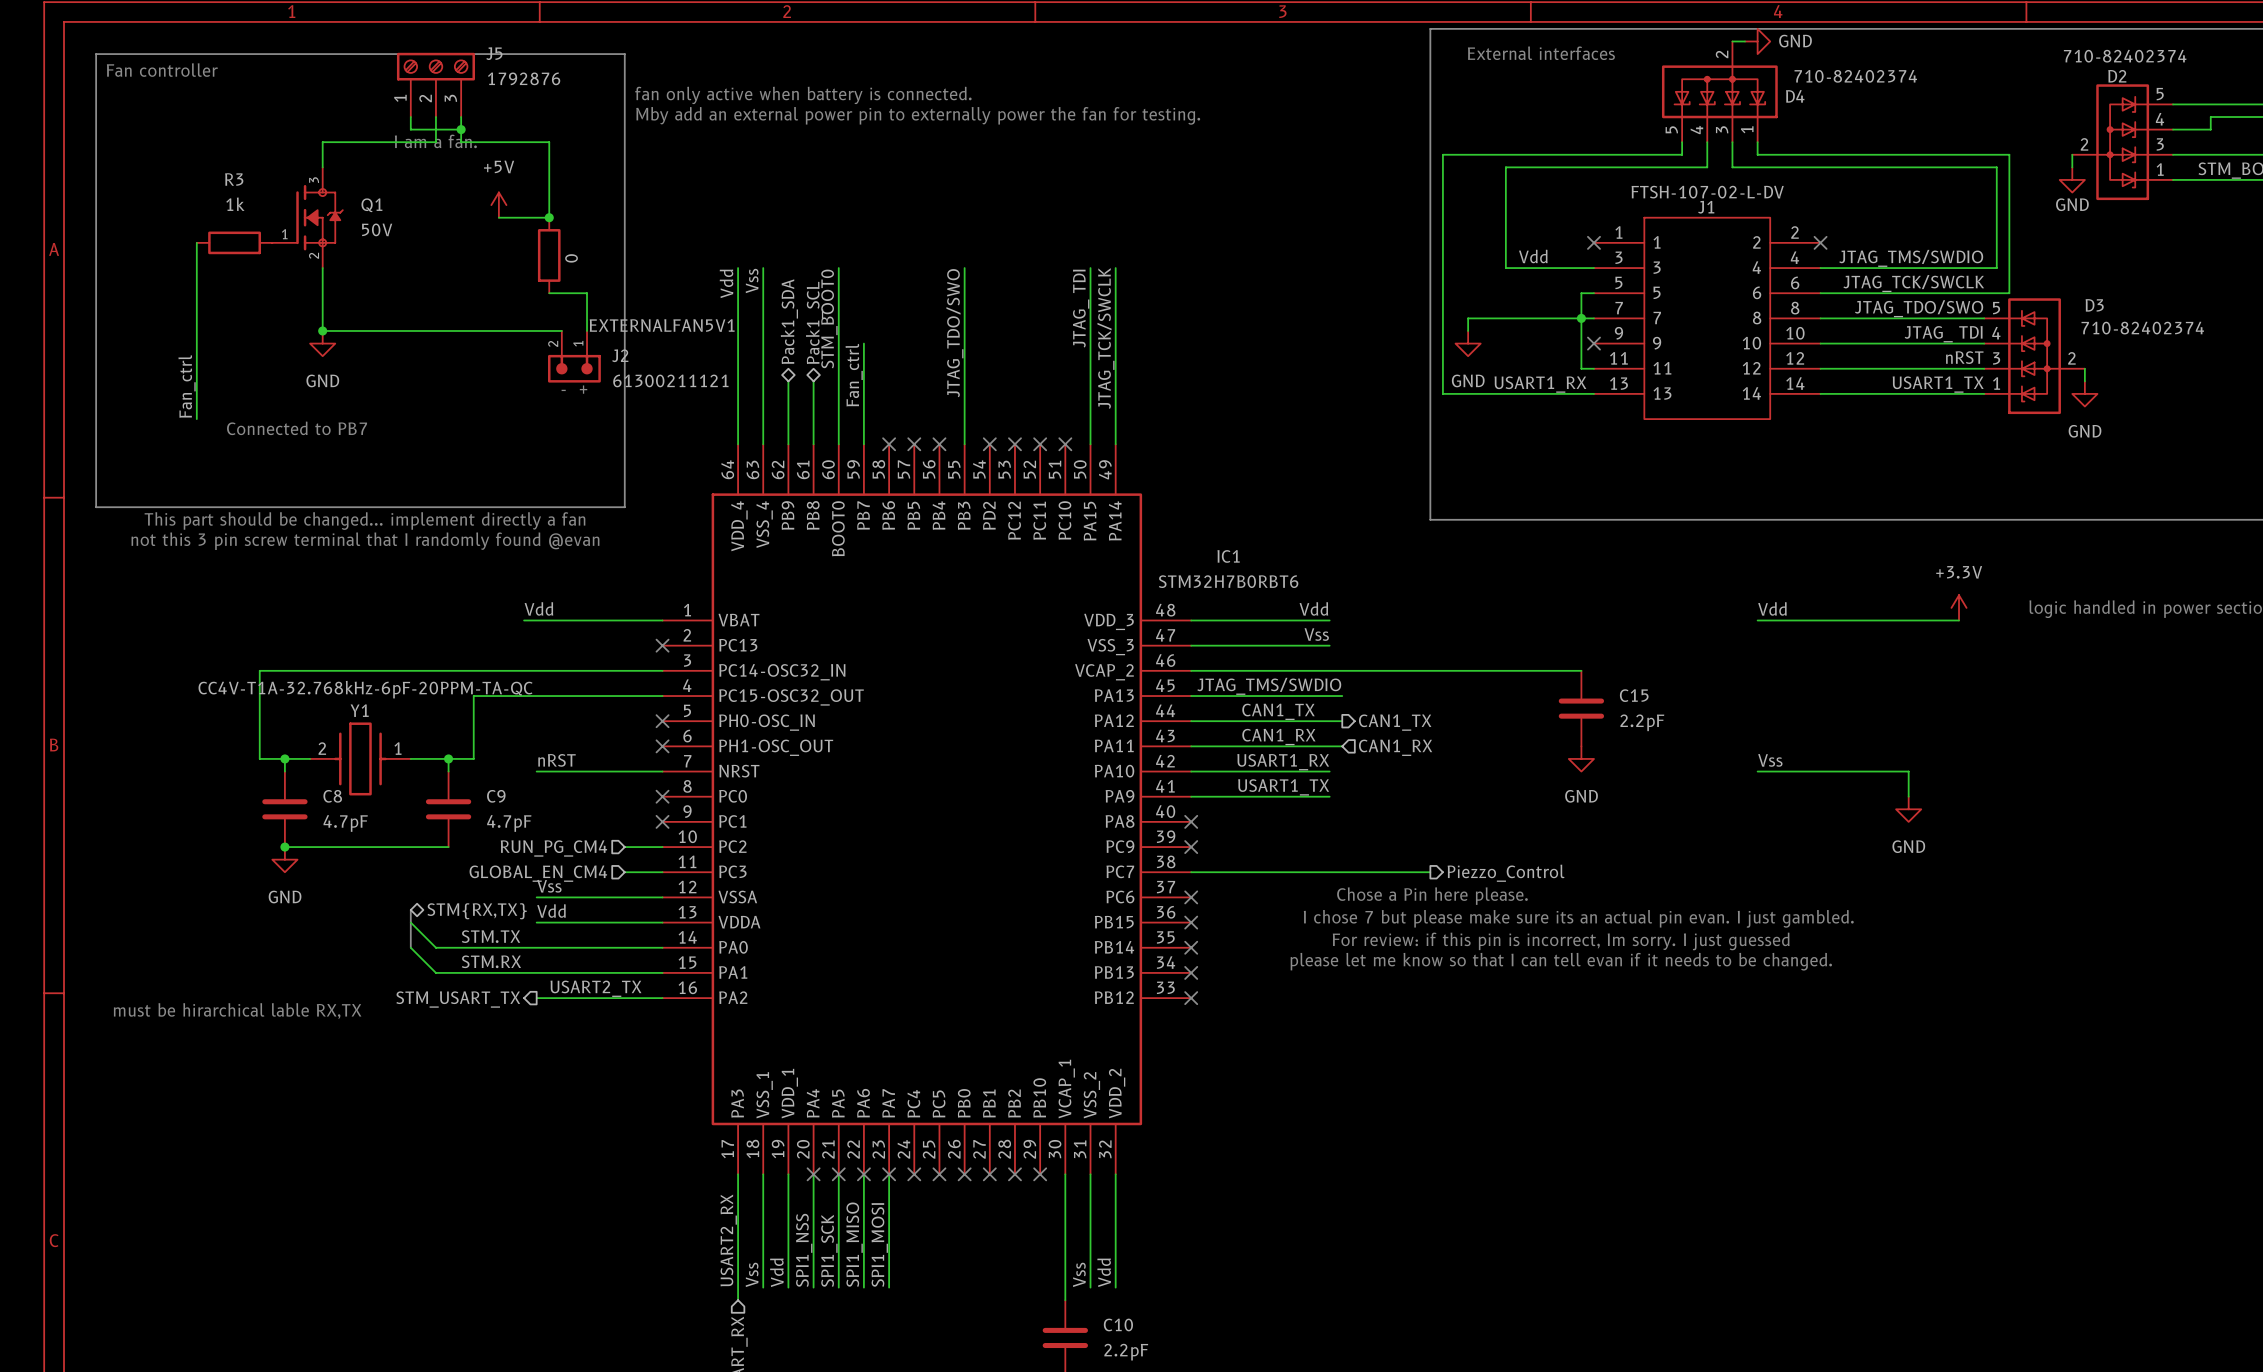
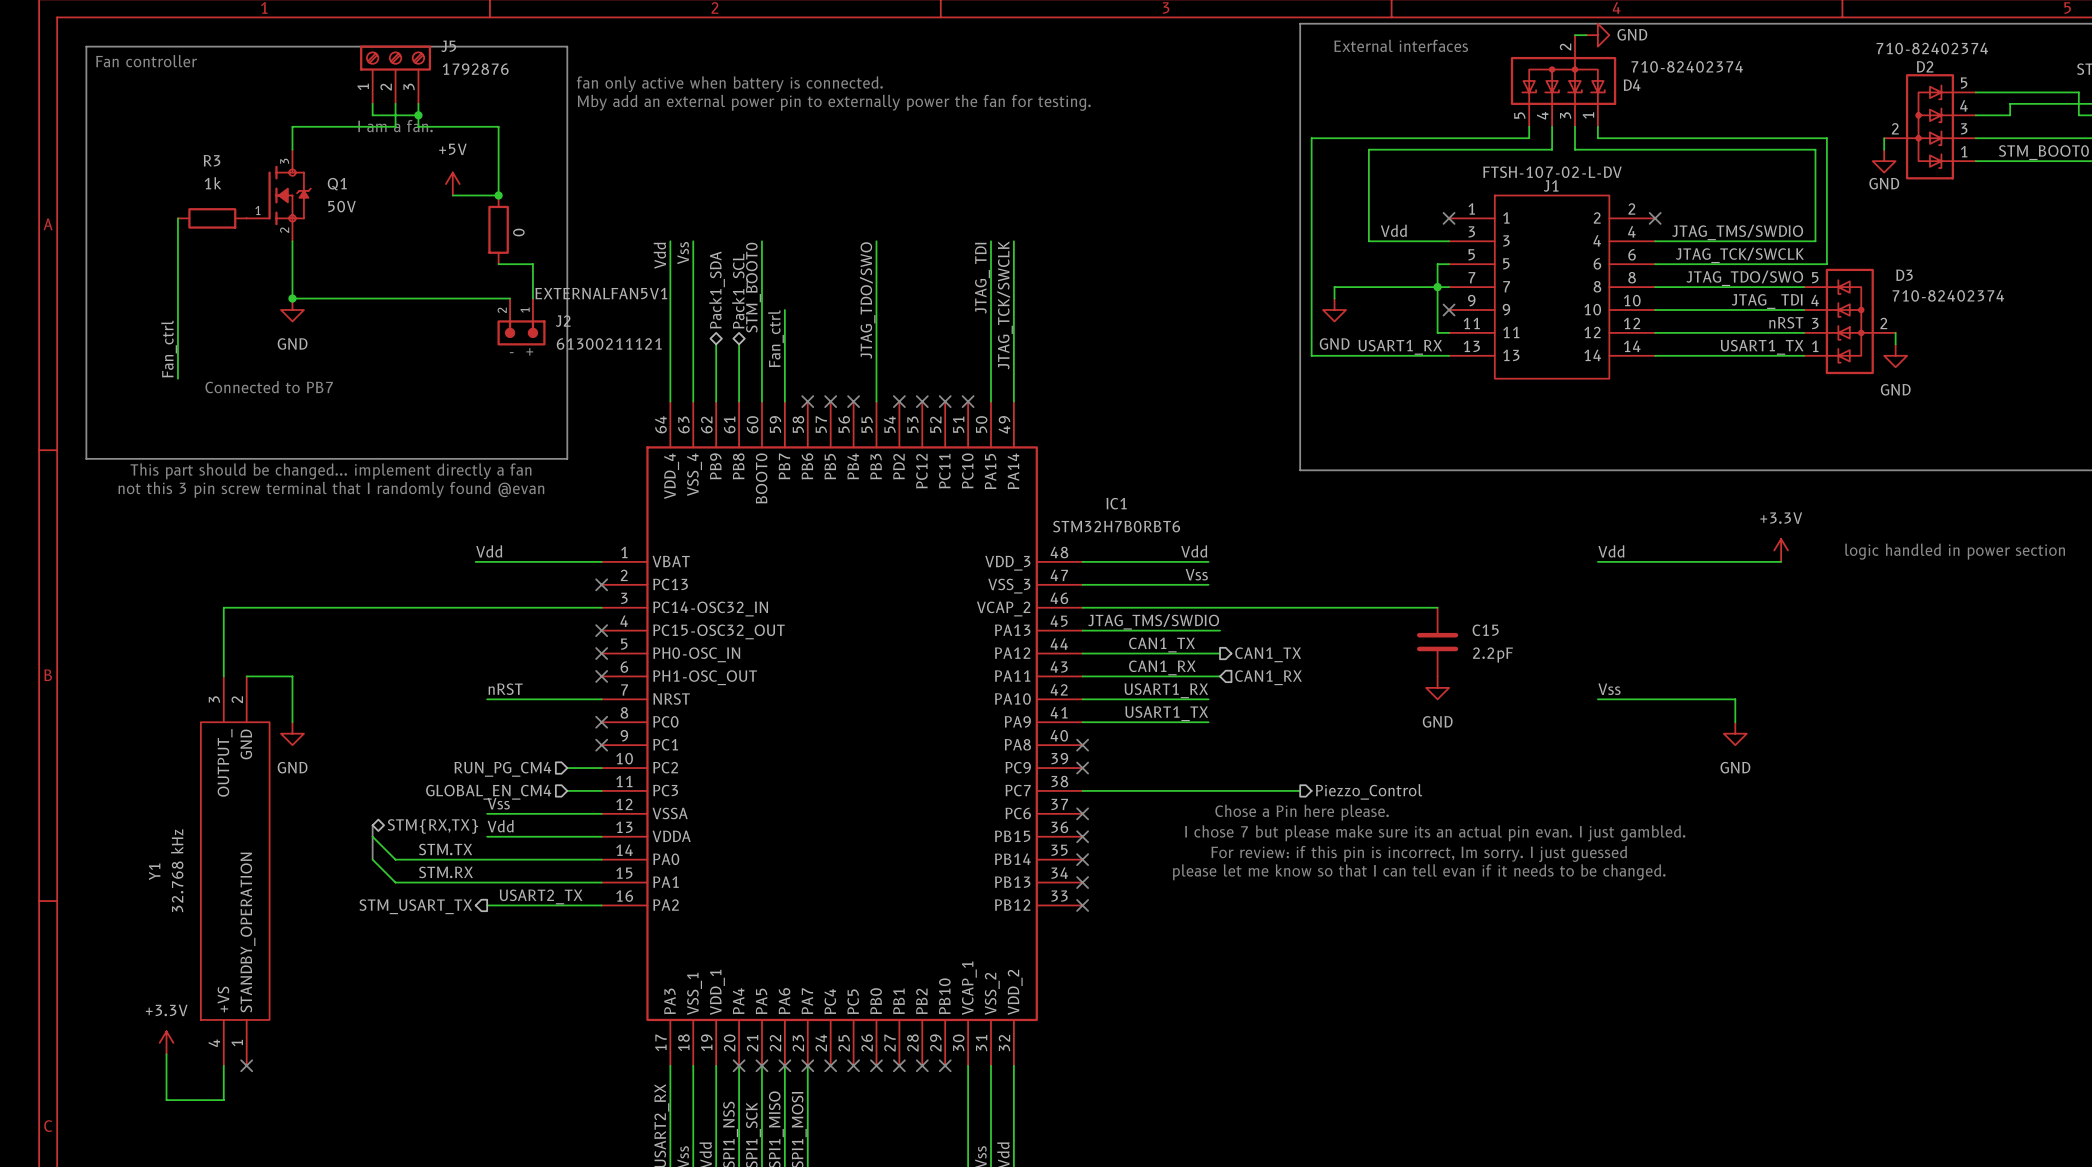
wire: (259, 670) (259, 758) (310, 758) -> (235, 607) (223, 607) (223, 676)
Y1 value: CC4V-T1A-32.768kHz-6pF-20PPM-TA-QC (365, 689) -> 32.768 kHz (177, 870)
wire: (662, 696) (473, 696) (473, 758) (410, 758) -> none
no-connect mark: none -> (601, 630)
Y1 name position: Y1 (359, 710) -> Y1 (154, 871)
Y1 symbol: [310, 722, 411, 796] -> [200, 676, 271, 1066]
wire: none -> (246, 676) (292, 676) (292, 722)
wire: (284, 758) (284, 771) -> none
junction: (284, 758) -> none
wire: (448, 758) (448, 771) -> none
junction: (448, 758) -> none
C8: 4.7pF (284, 809) -> none
C9: 4.7pF (448, 809) -> none
wire: (284, 847) (448, 847) -> none
junction: (284, 847) -> none
power symbol position: GND (284, 859) -> GND (292, 733)
text: must be hirarchical lable RX,TX (237, 1011) -> none
power symbol: none -> +3.3V (166, 1042)
wire: none -> (166, 1054) (166, 1100) (223, 1100) (223, 1065)
no-connect mark: none -> (246, 1065)

